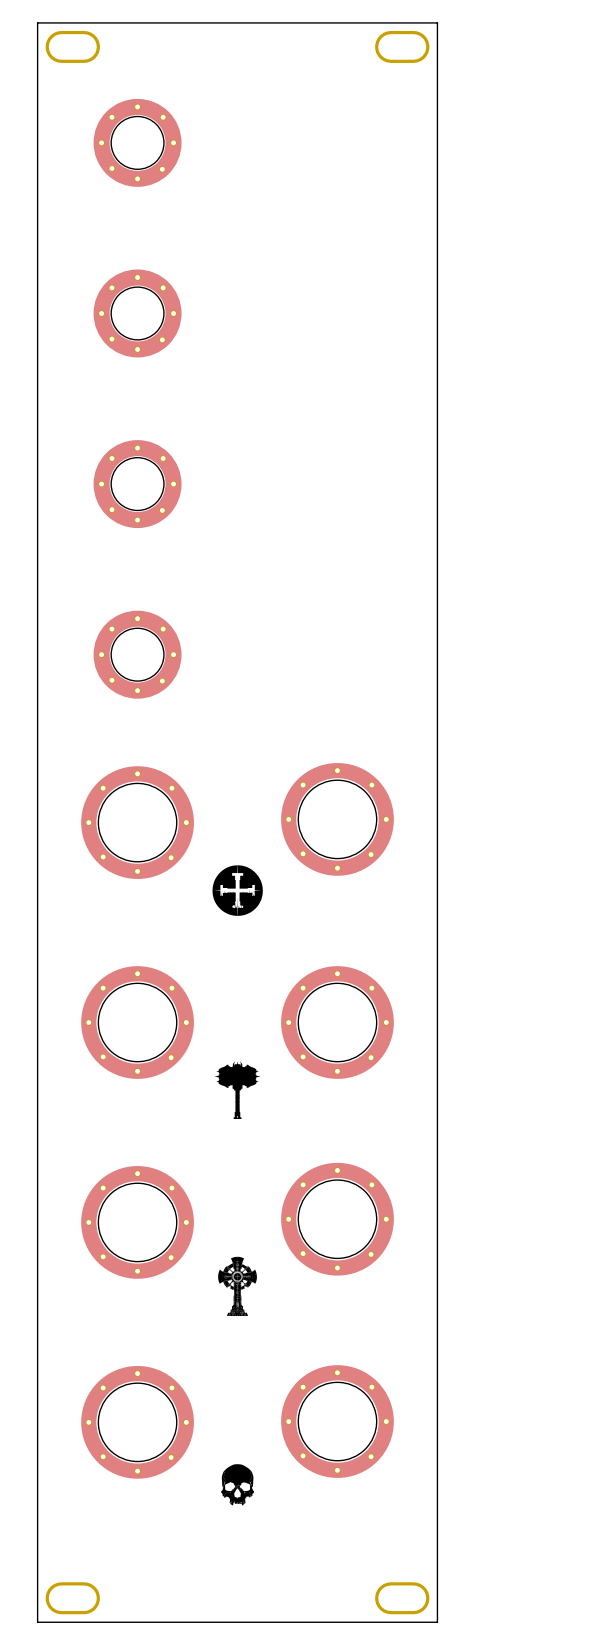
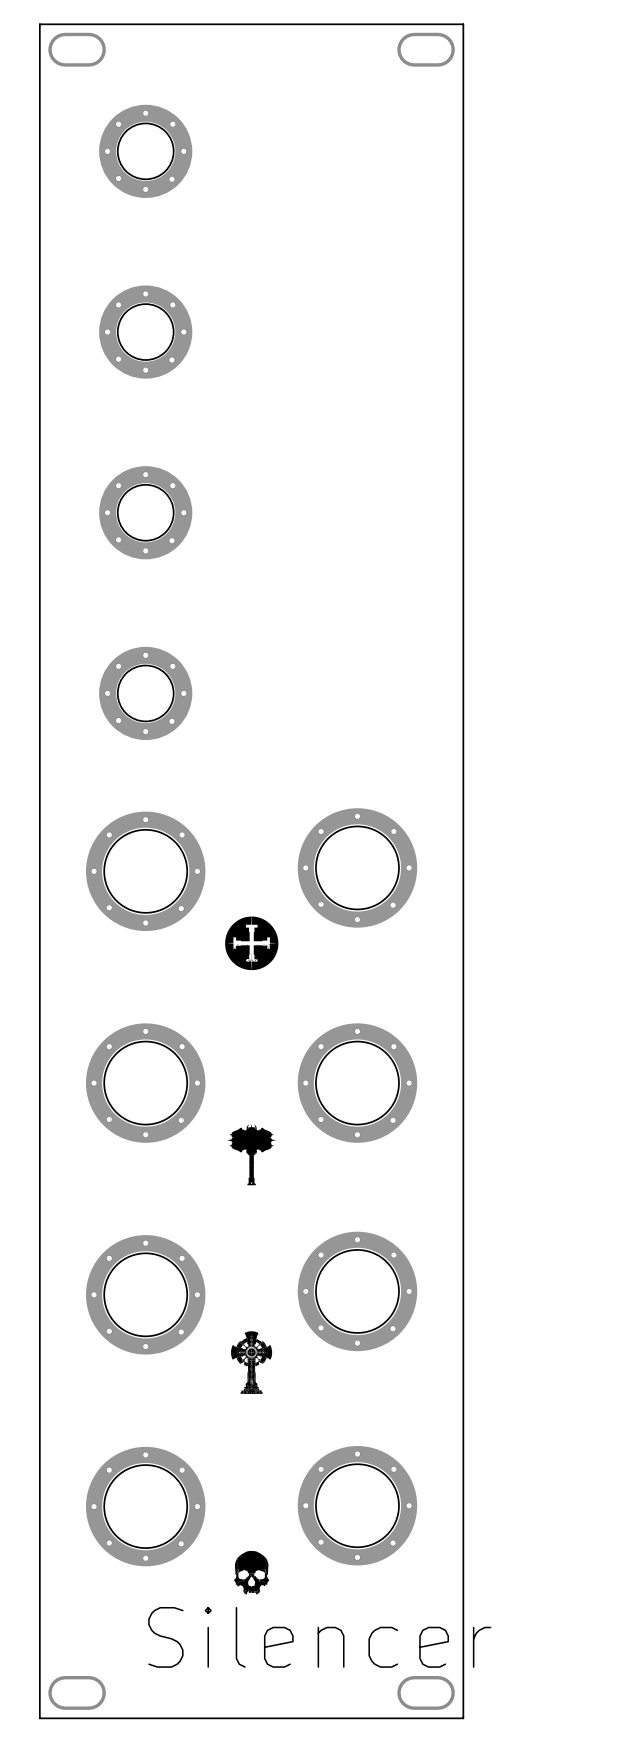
text: none -> Silencer (319, 1637)

